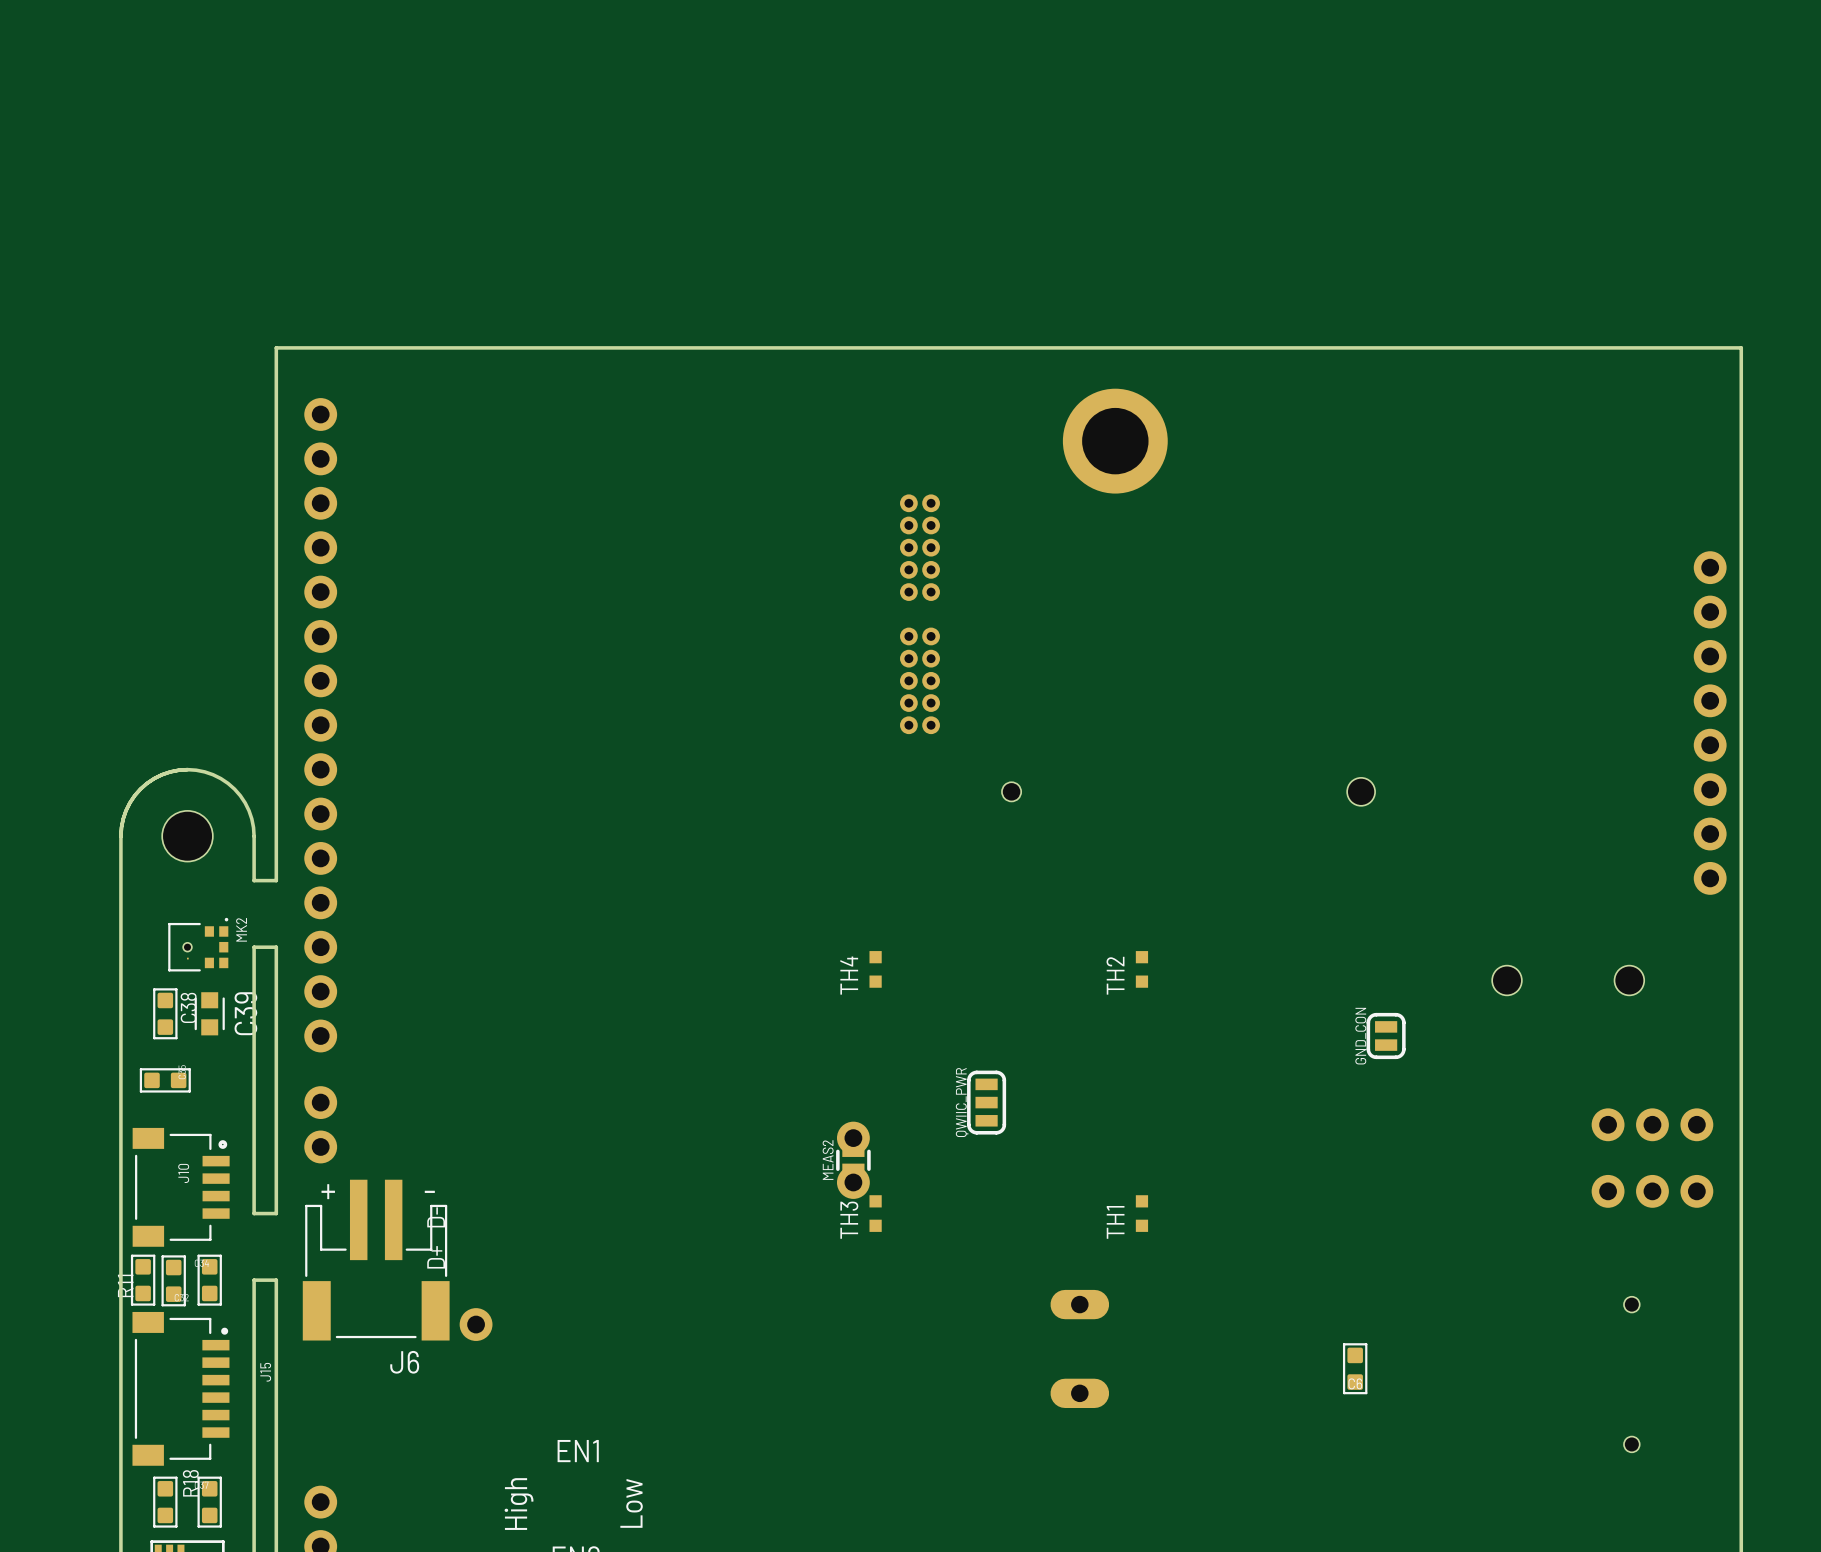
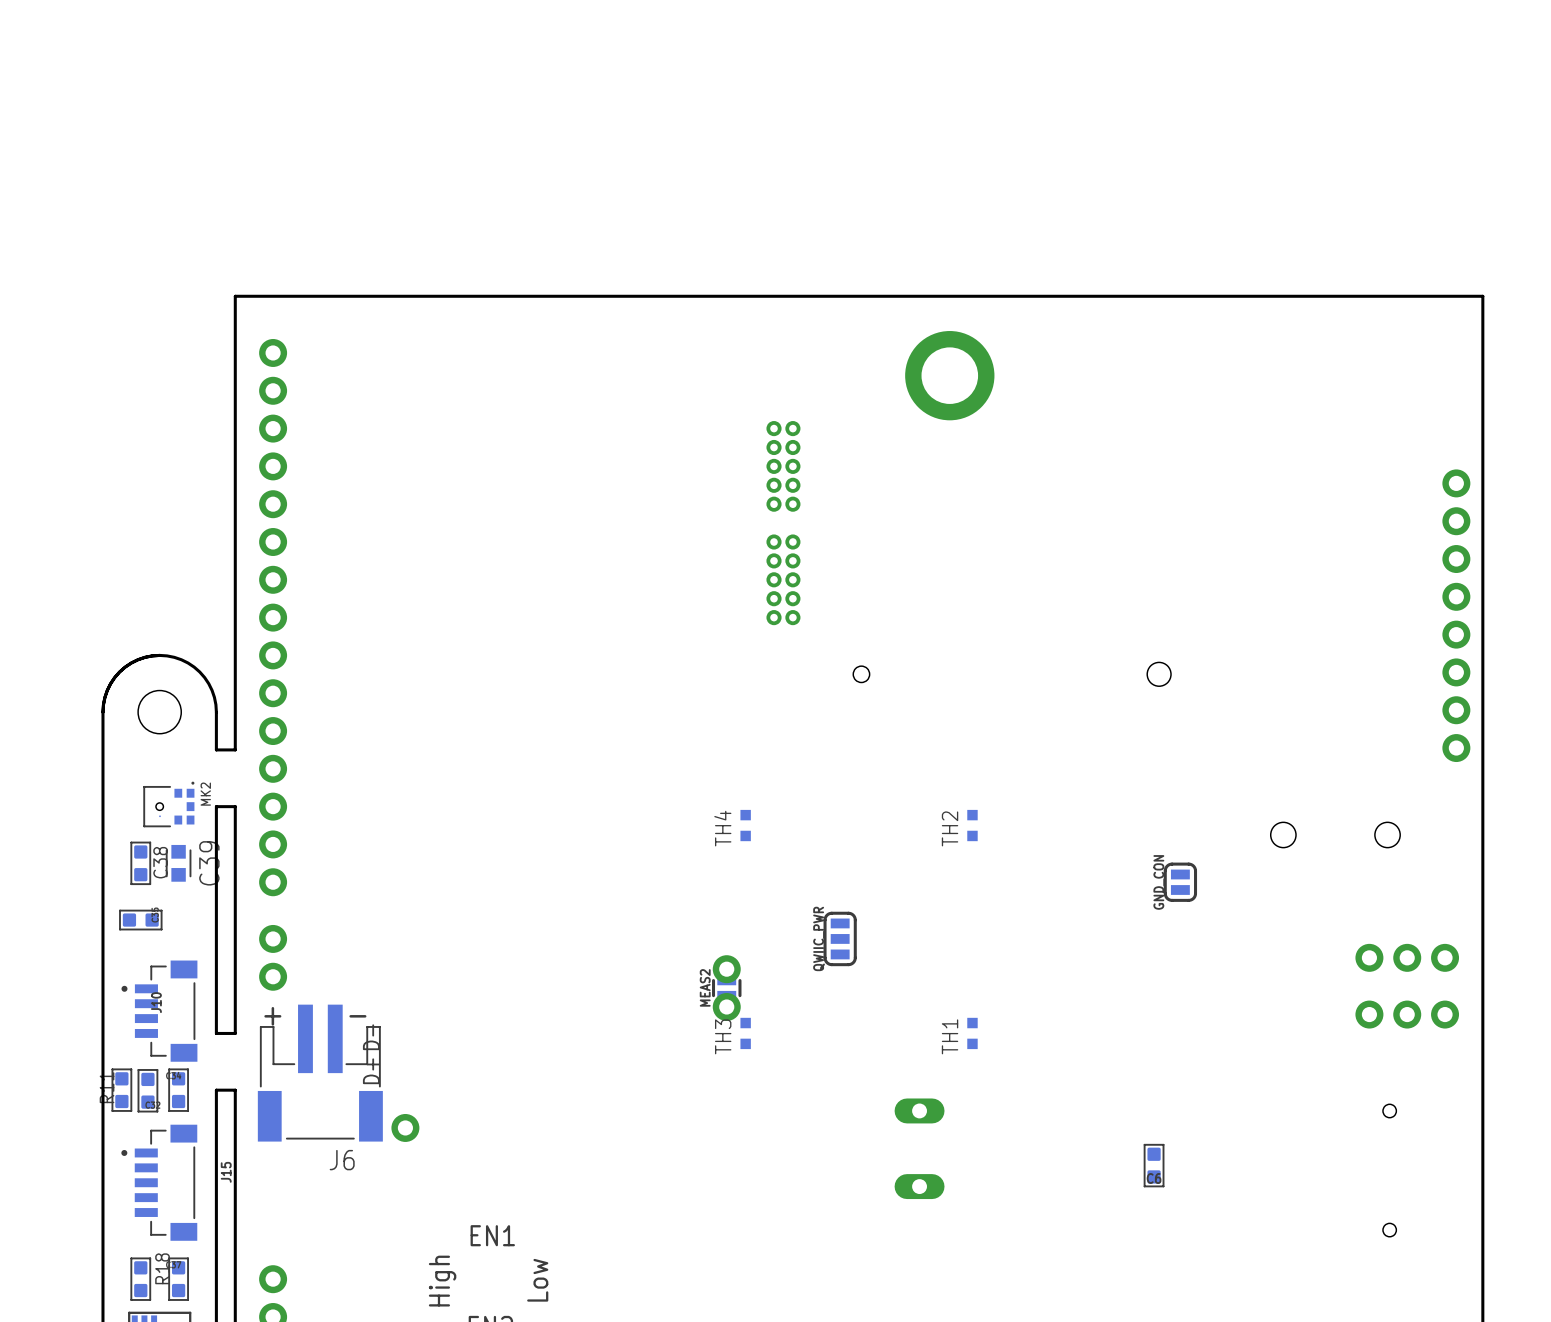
J10 footprint: [132, 1127, 230, 1247] -> [121, 960, 198, 1062]
J15 footprint: [132, 1311, 230, 1466] -> [121, 1124, 198, 1241]

